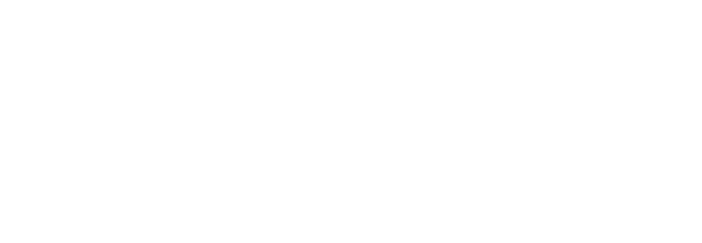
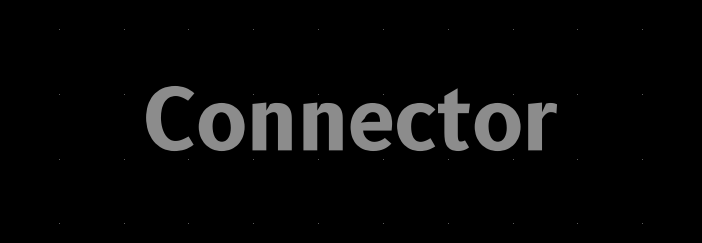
text: none -> Connector (351, 118)

